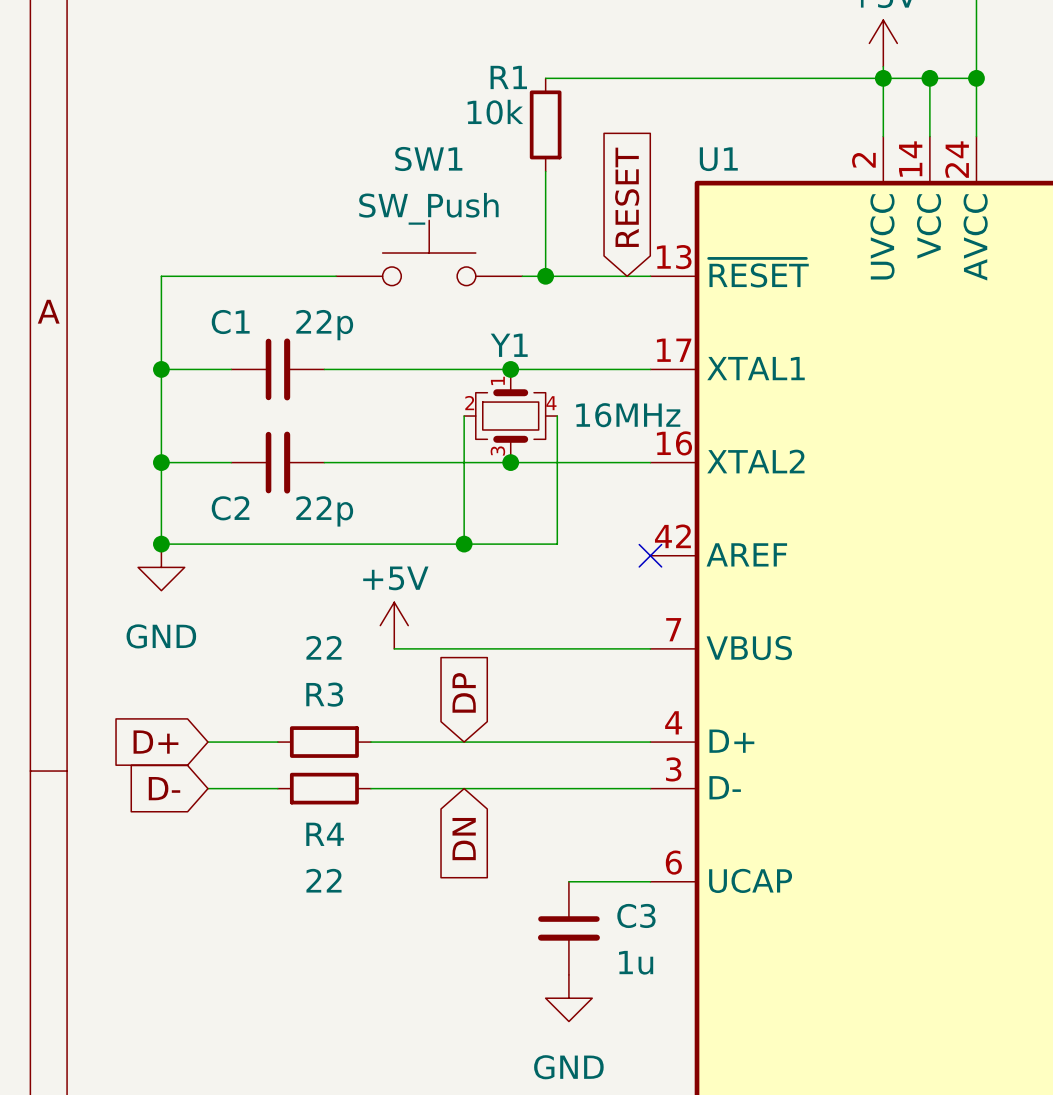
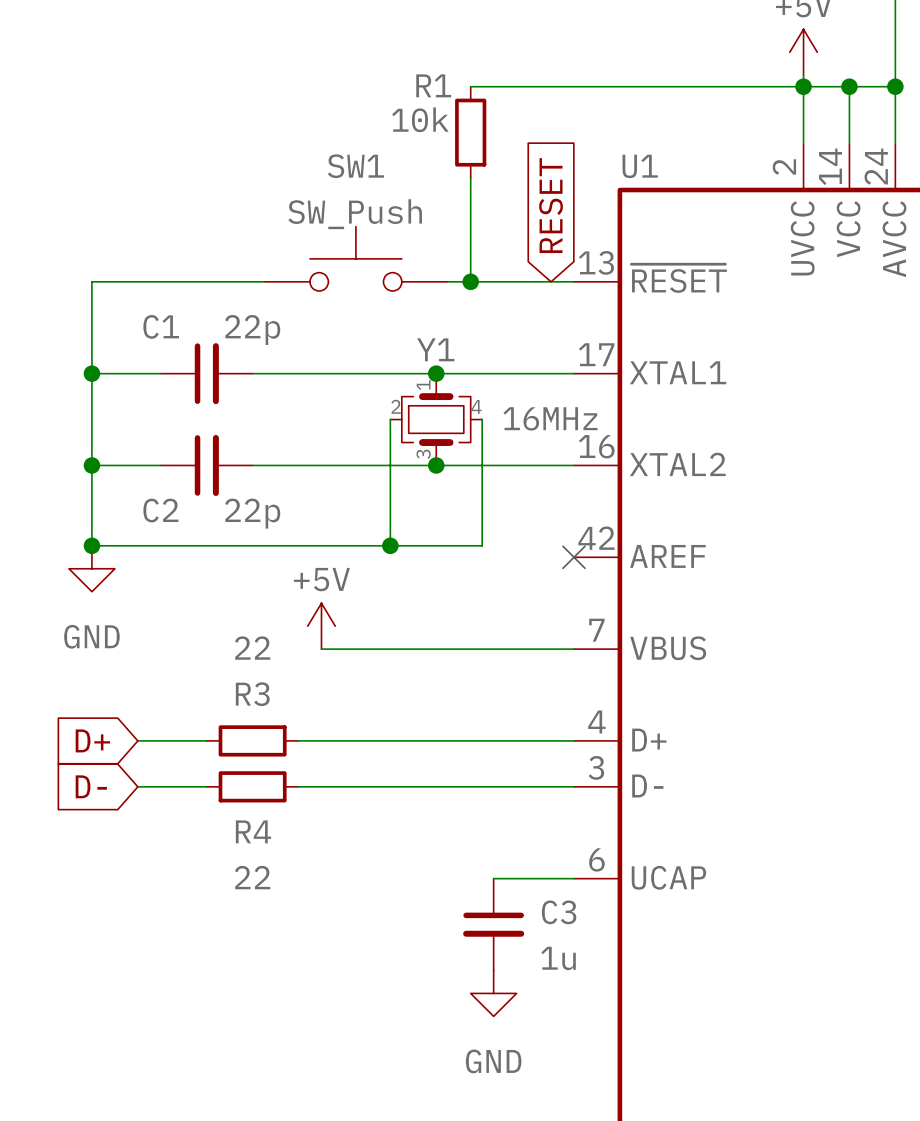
global label: DP (464, 692) -> none
global label: DN (464, 839) -> none

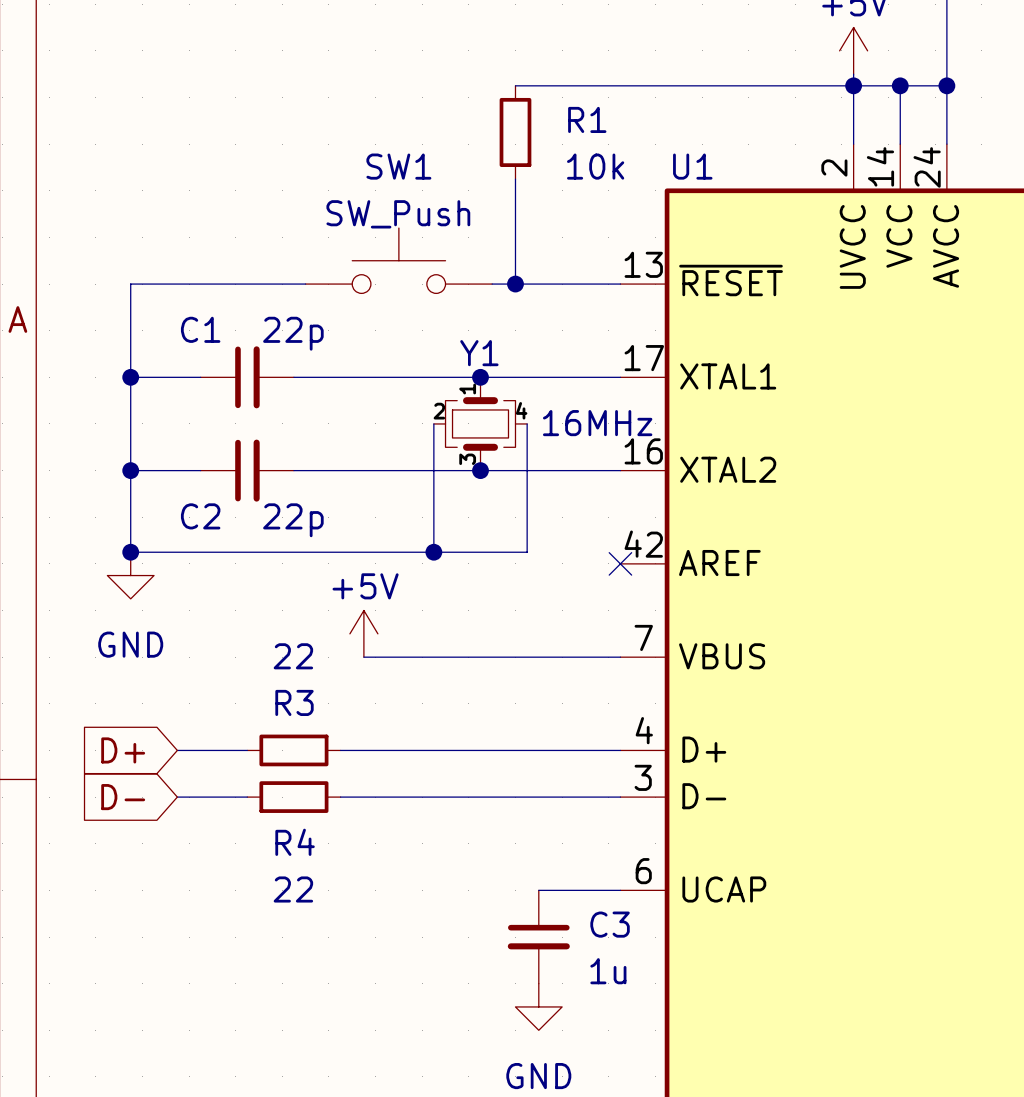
R1 name position: R1 (433, 85) -> R1 (587, 119)
R1 value position: 10k (420, 119) -> 10k (595, 166)
global label: RESET (551, 205) -> none

